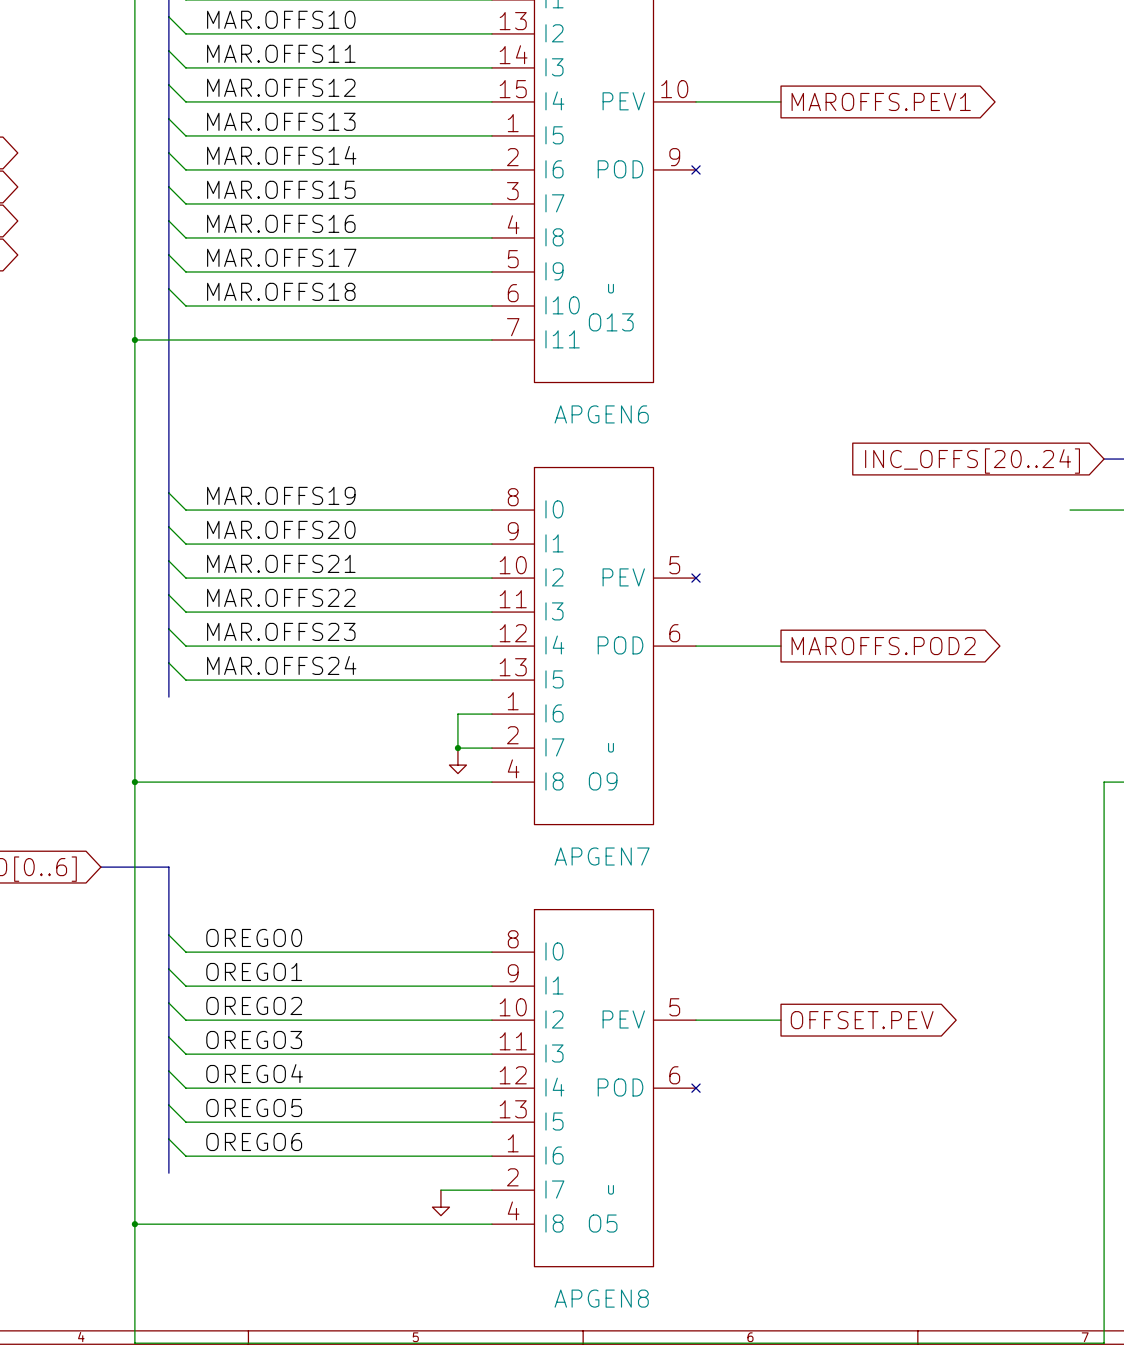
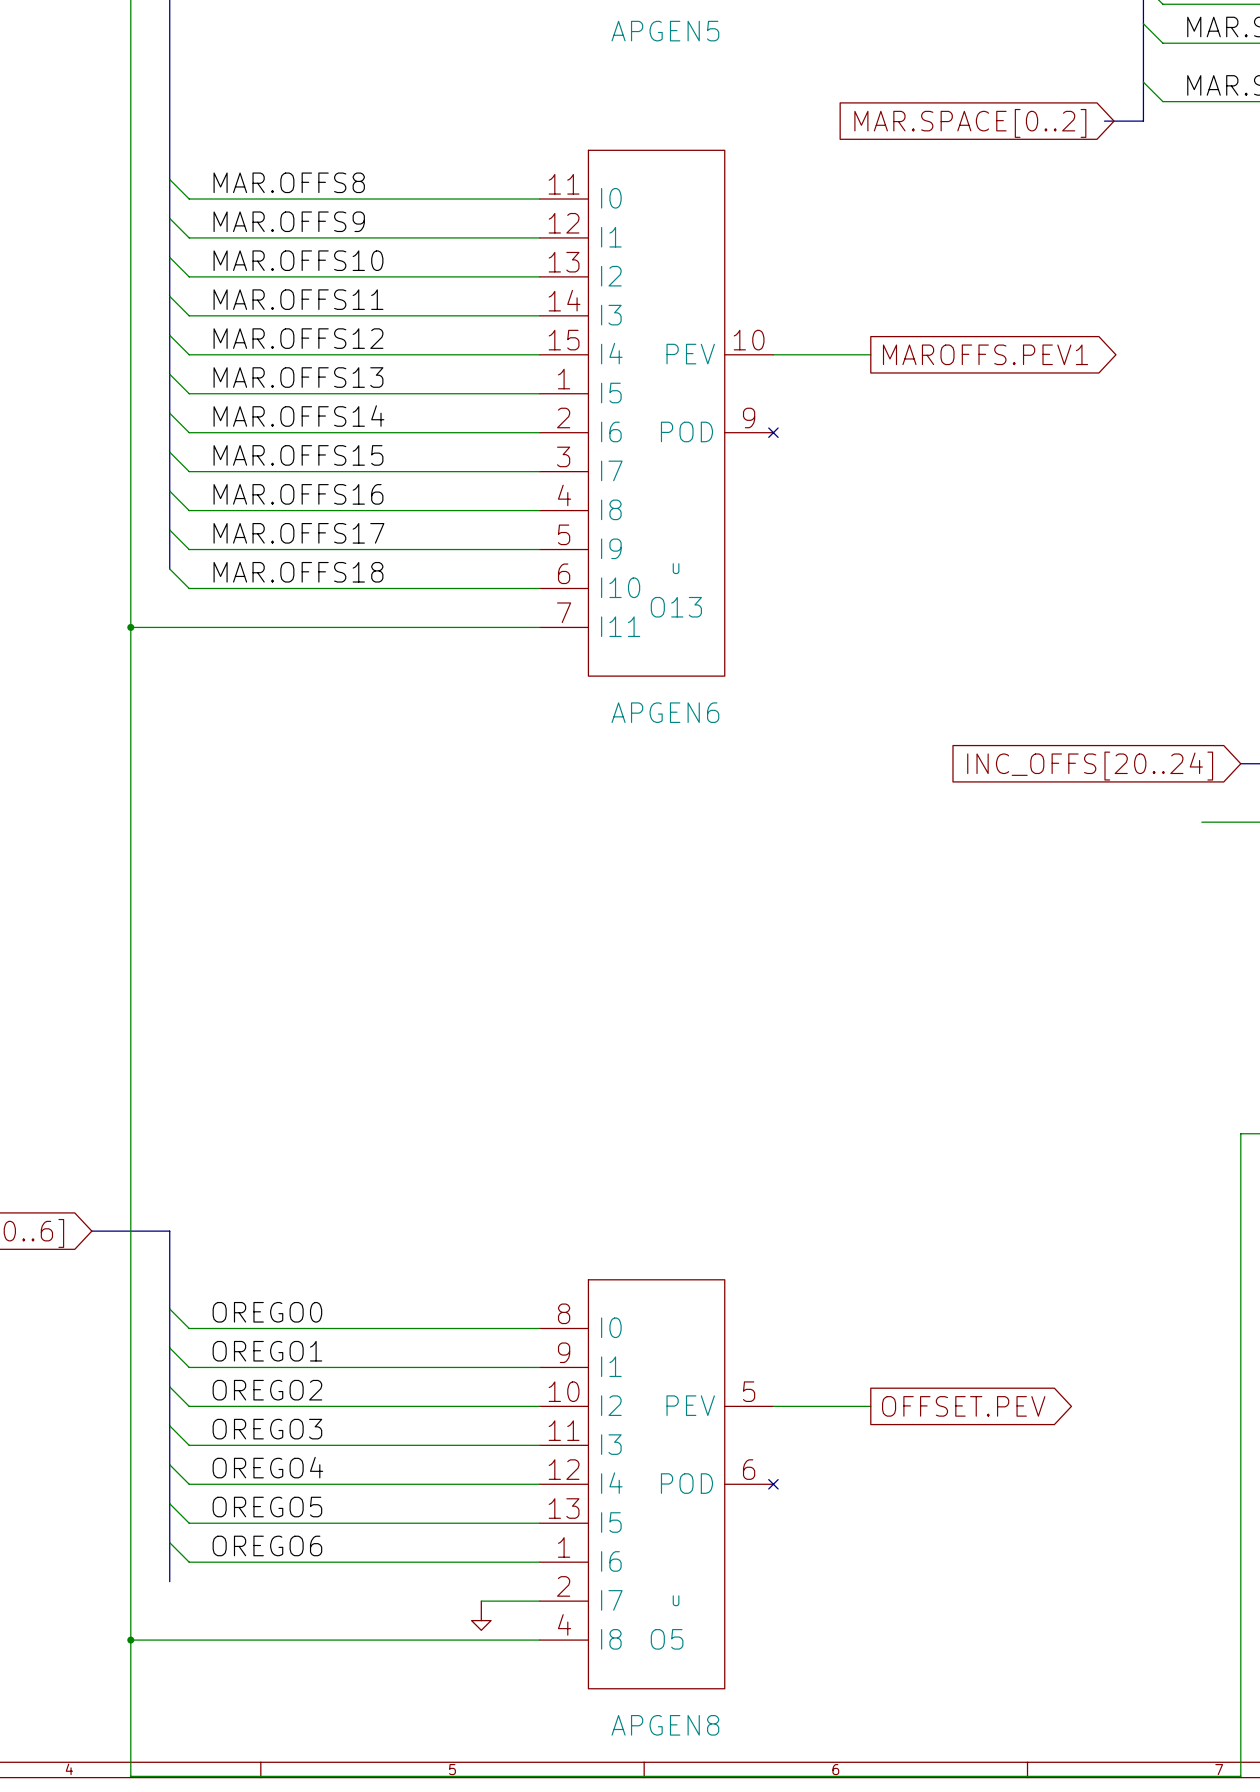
bus: (168, 288) (168, 697) -> none
wire: (168, 493) (185, 510) (491, 510) -> none
label: MAR.OFFS19 (281, 495) -> none
wire: (168, 527) (185, 544) (491, 544) -> none
label: MAR.OFFS20 (281, 529) -> none
wire: (168, 561) (185, 578) (491, 578) -> none
label: MAR.OFFS21 (281, 563) -> none
no-connect mark: (696, 578) -> none
wire: (168, 595) (185, 612) (491, 612) -> none
label: MAR.OFFS22 (281, 597) -> none
wire: (168, 629) (185, 646) (491, 646) -> none
label: MAR.OFFS23 (281, 631) -> none
U: (593, 646) -> none
wire: (696, 646) (781, 646) -> none
global label: MAROFFS.POD2 (883, 646) -> none
wire: (168, 663) (185, 680) (491, 680) -> none
label: MAR.OFFS24 (281, 665) -> none
wire: (491, 714) (457, 714) (457, 748) (491, 748) -> none
junction: (457, 748) -> none
power symbol: (457, 761) -> none
wire: (134, 782) (491, 782) -> none
junction: (134, 782) -> none

